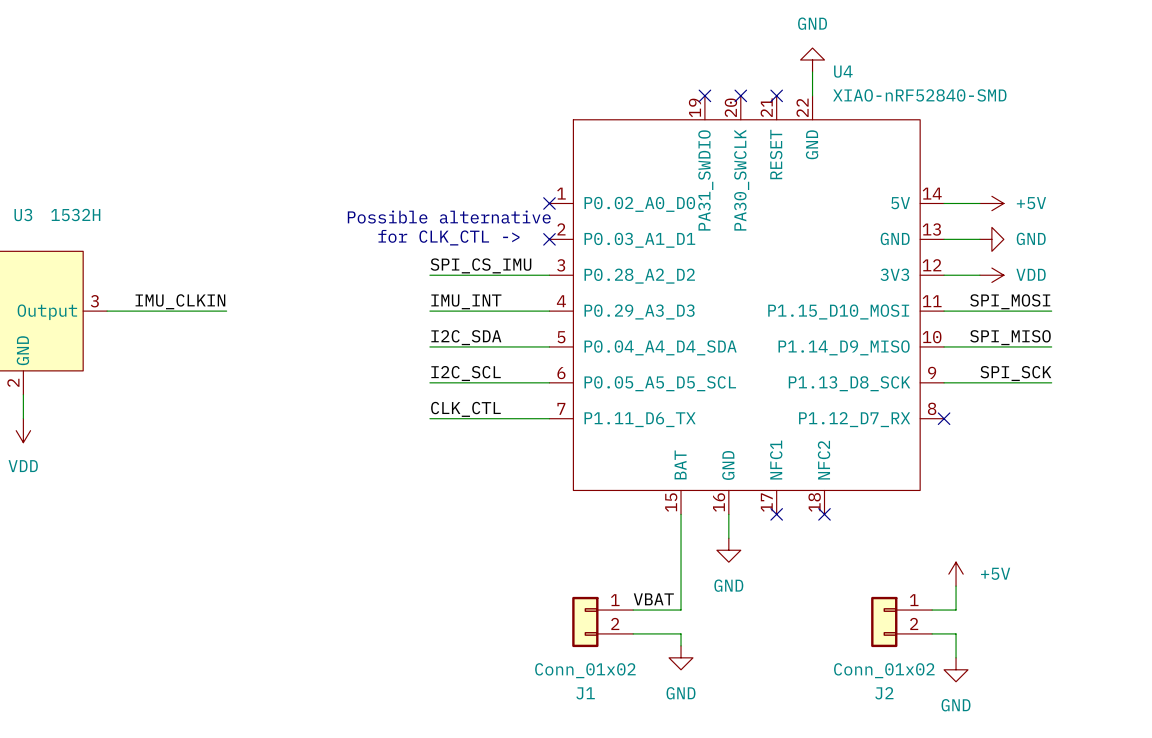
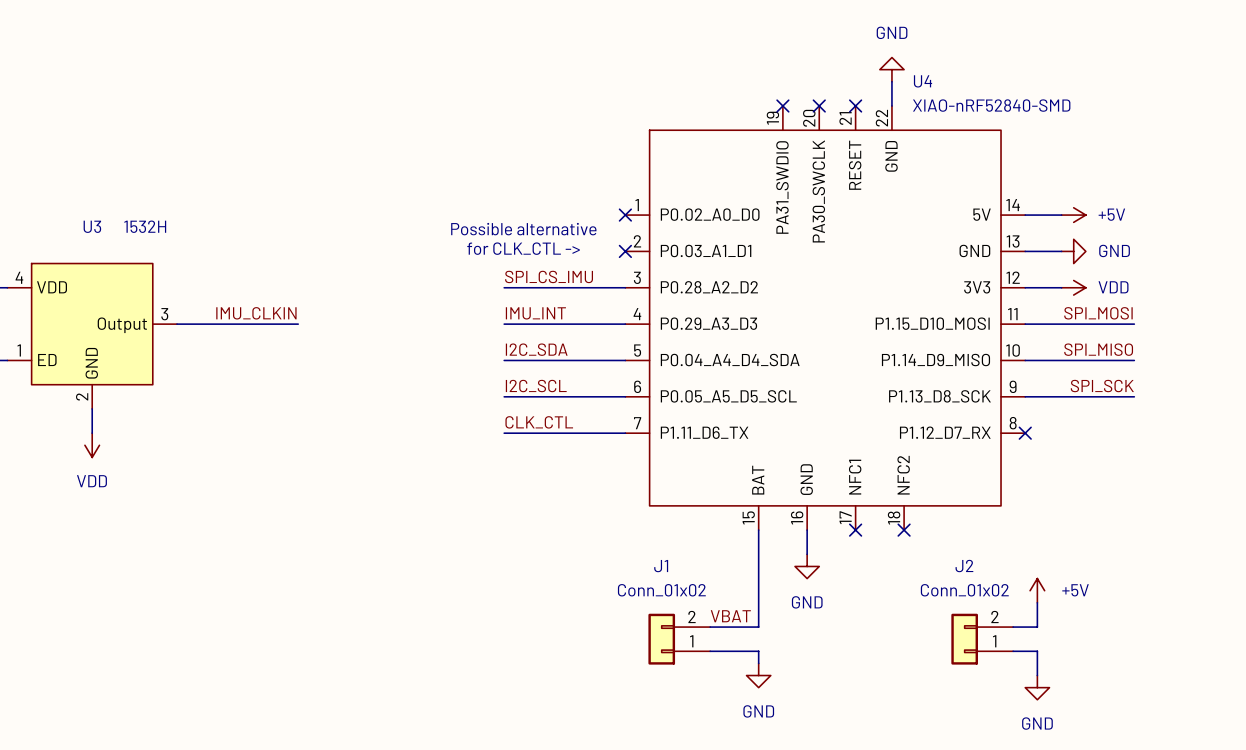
J1 flip: as is (585, 621) -> up-down (661, 639)
J2 flip: as is (884, 621) -> up-down (964, 639)

